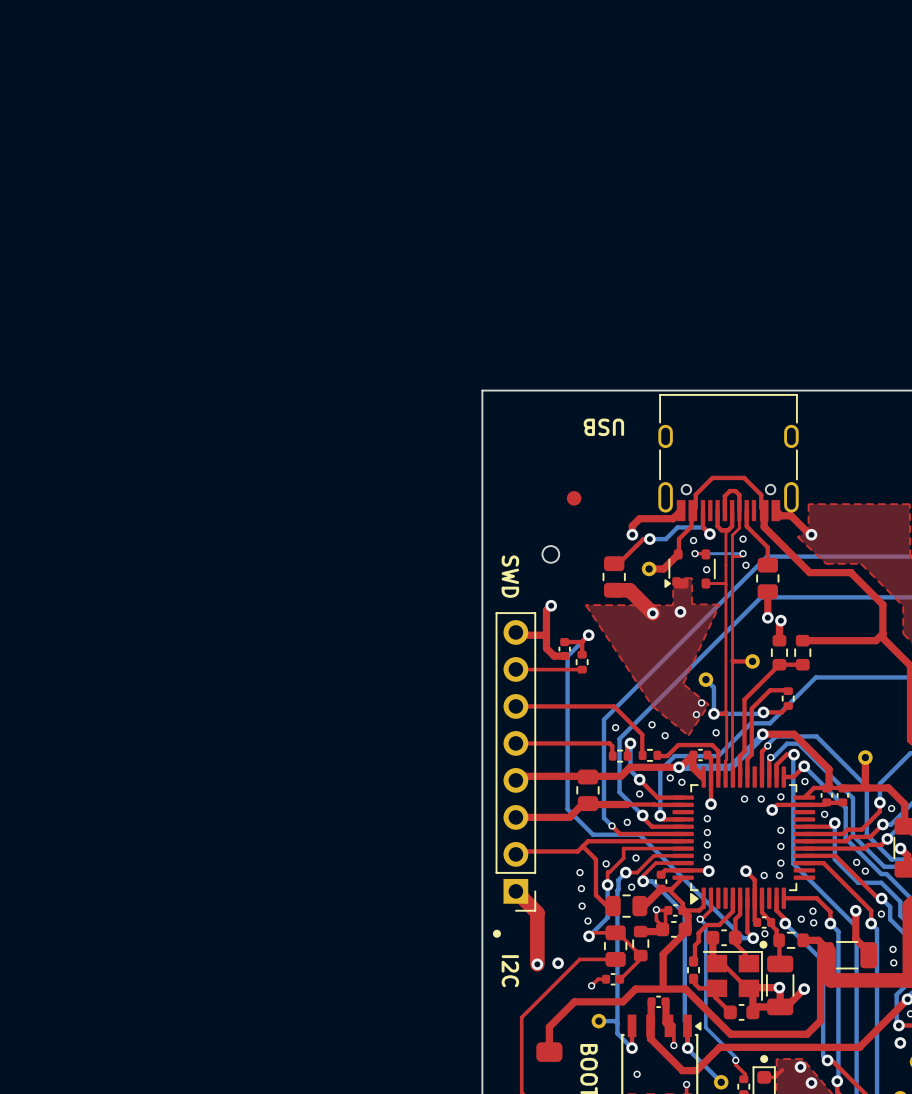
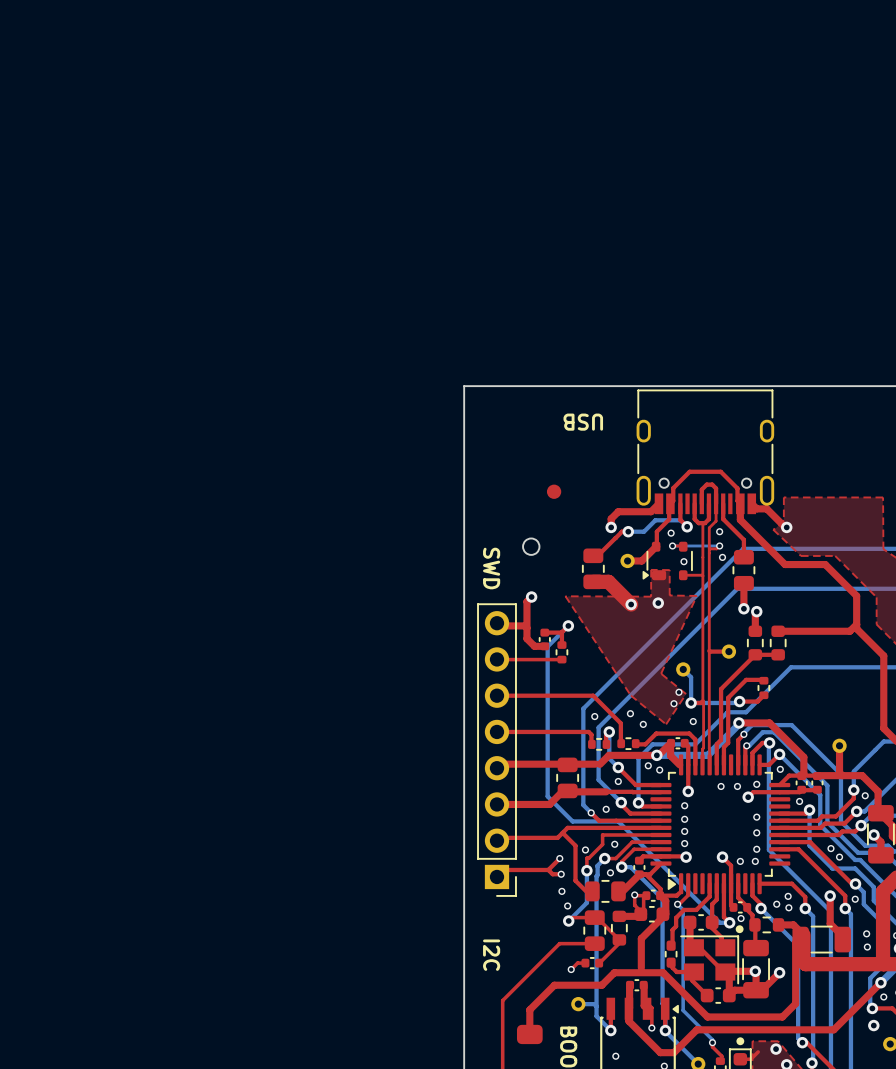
top track: none -> (559, 858) (548, 869)
top track: none -> (548, 869) (552, 874) (561, 874)
top track: (515, 891) (537, 912) (537, 964) -> (496, 876) (503, 869) (548, 869)
drawing: [492, 929, 501, 938] -> none
via: (558, 963) -> none
via: (537, 964) -> none

